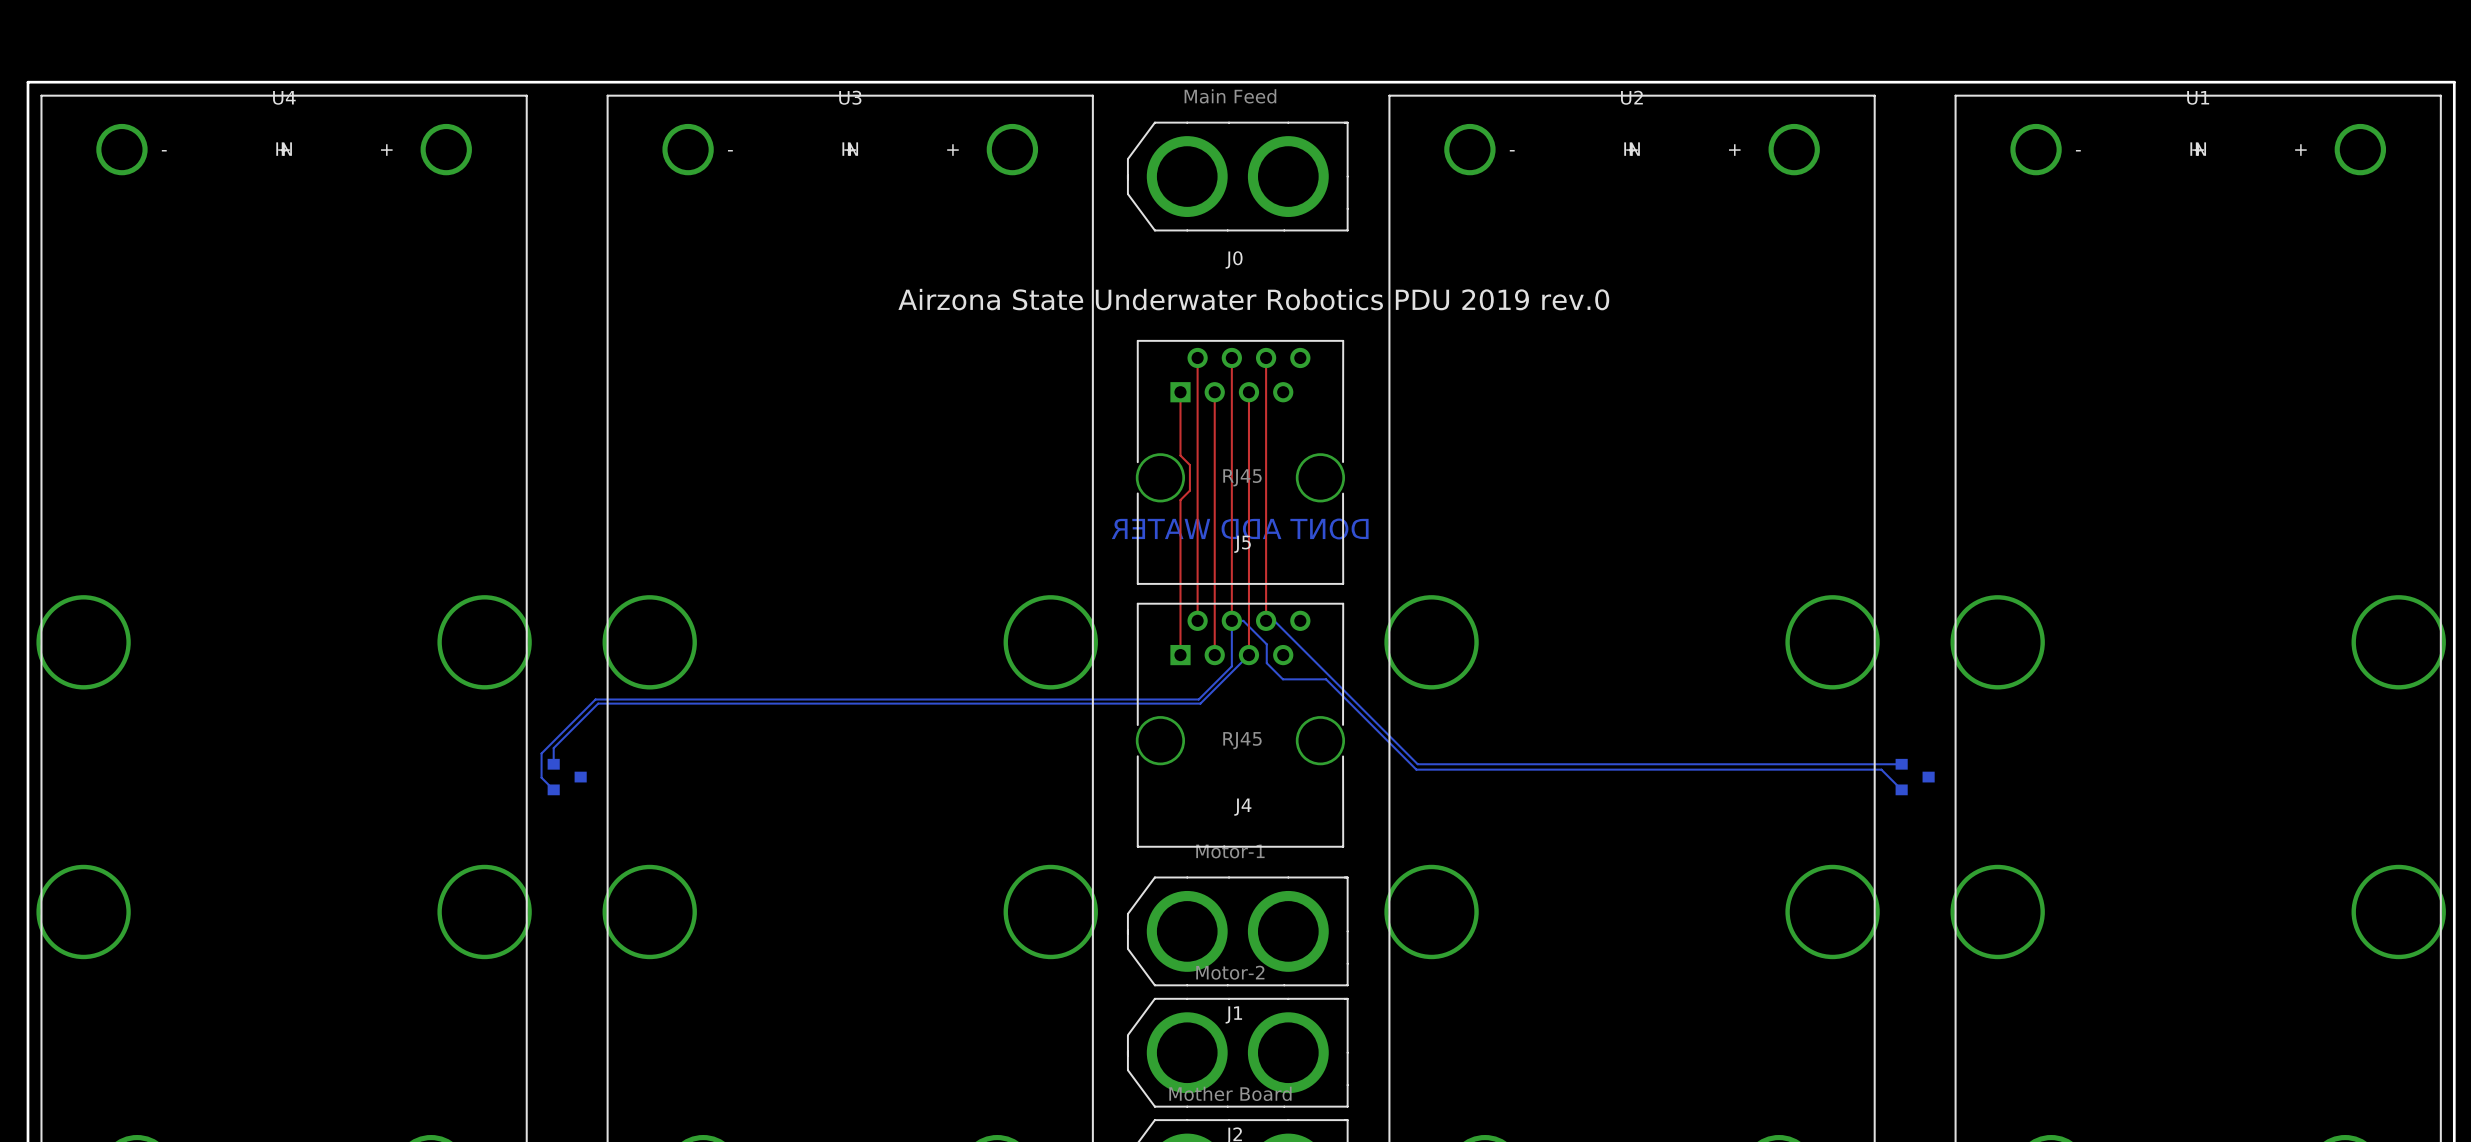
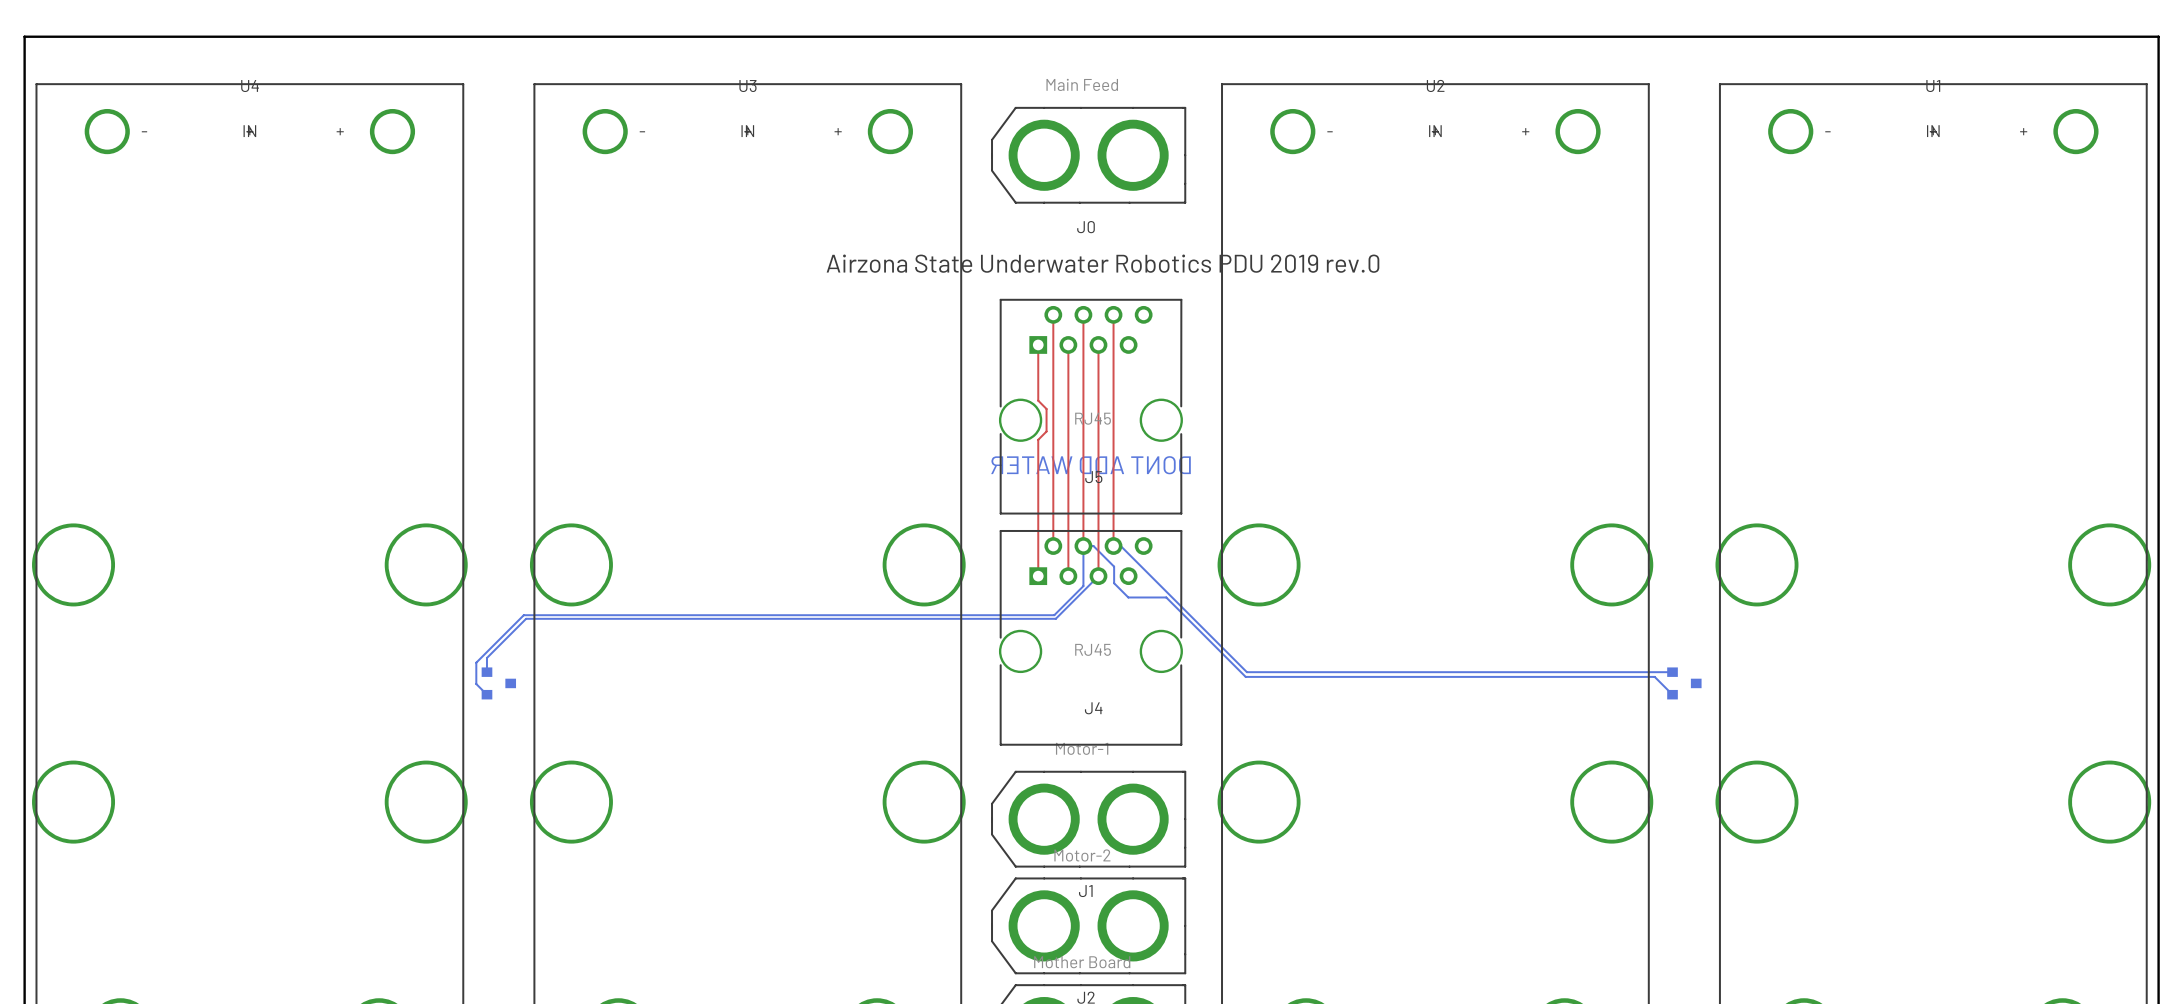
board edge: (27, 82) (2454, 82) -> (24, 72) (24, 36) (2158, 36) (2158, 72)

